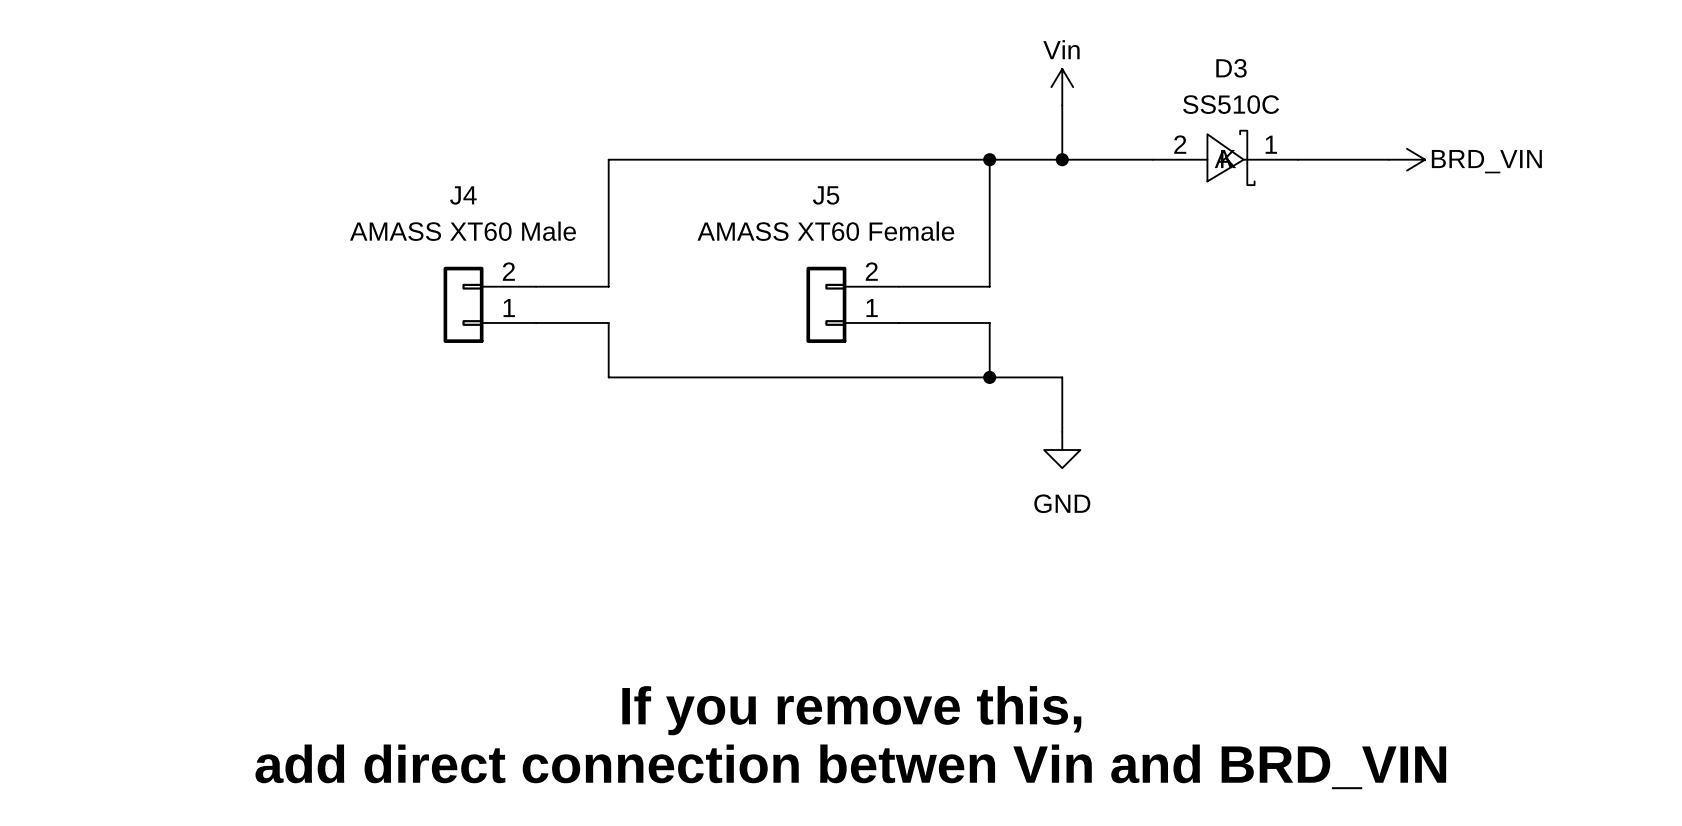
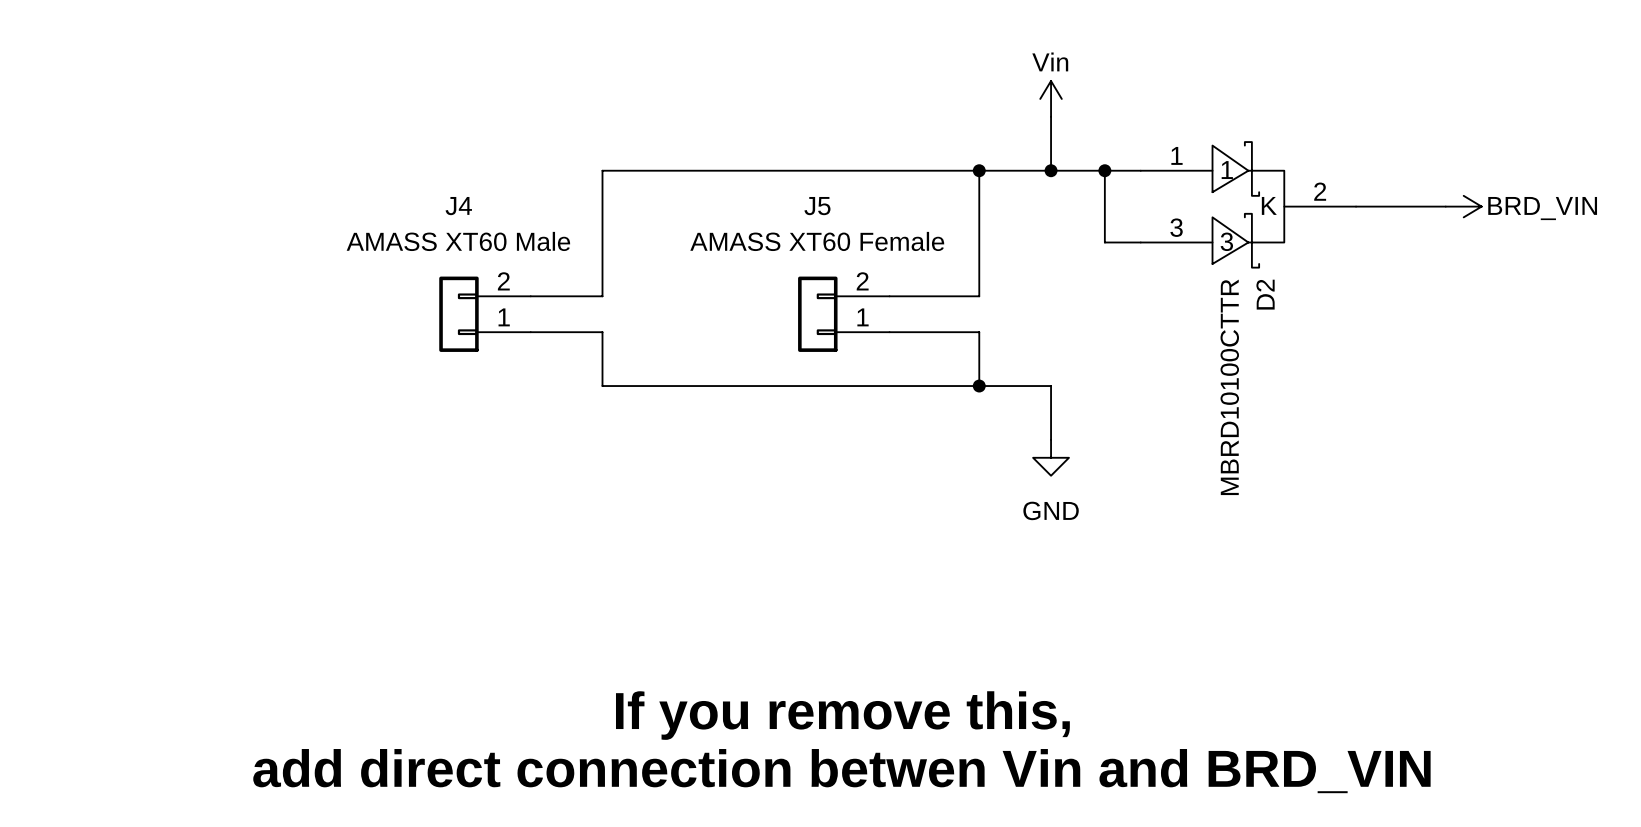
D3: SS510C (1225, 157) -> none
wire: none -> (1104, 170) (1104, 242) (1140, 242)
junction: none -> (1104, 170)
wire: (1298, 159) (1388, 159) -> (1356, 206) (1445, 206)
power symbol position: BRD_VIN (1407, 159) -> BRD_VIN (1463, 206)
D2: none -> MBRD10100CTTR (1248, 204)

